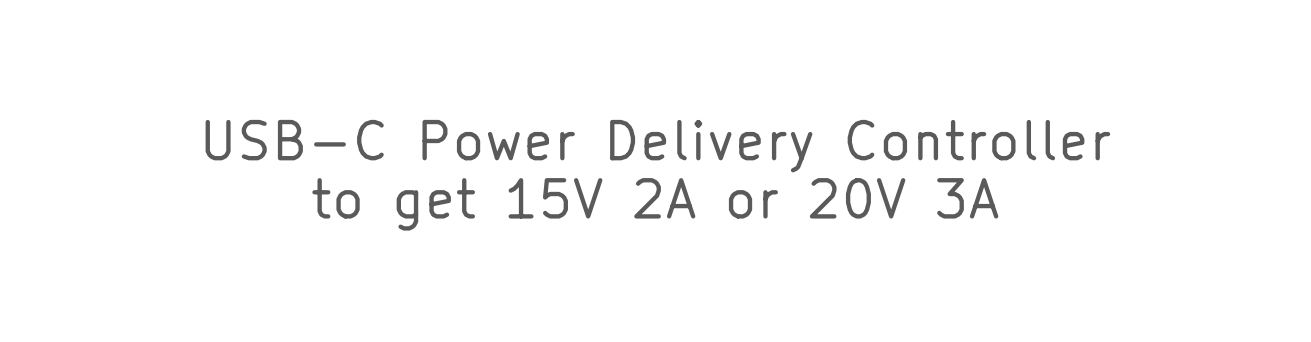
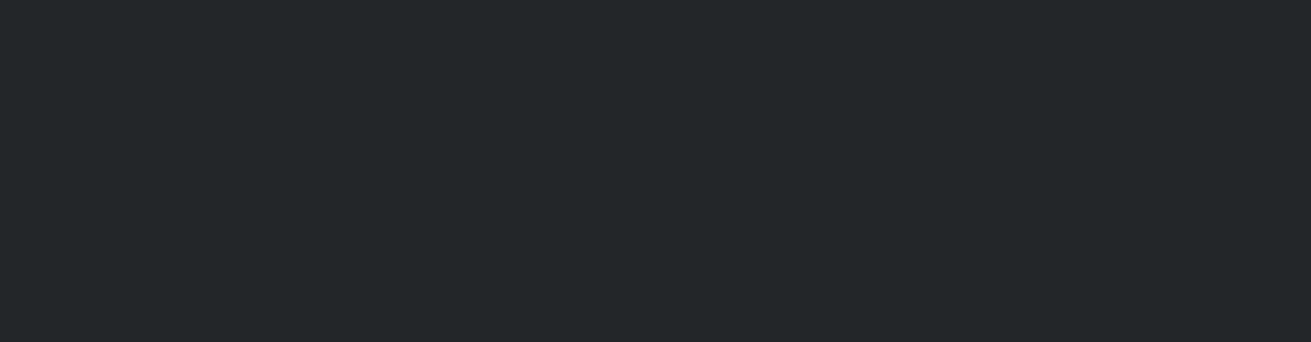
text: USB-C Power Delivery Controller (657, 146) -> none
text: to get 15V 2A or 20V 3A (655, 204) -> none

